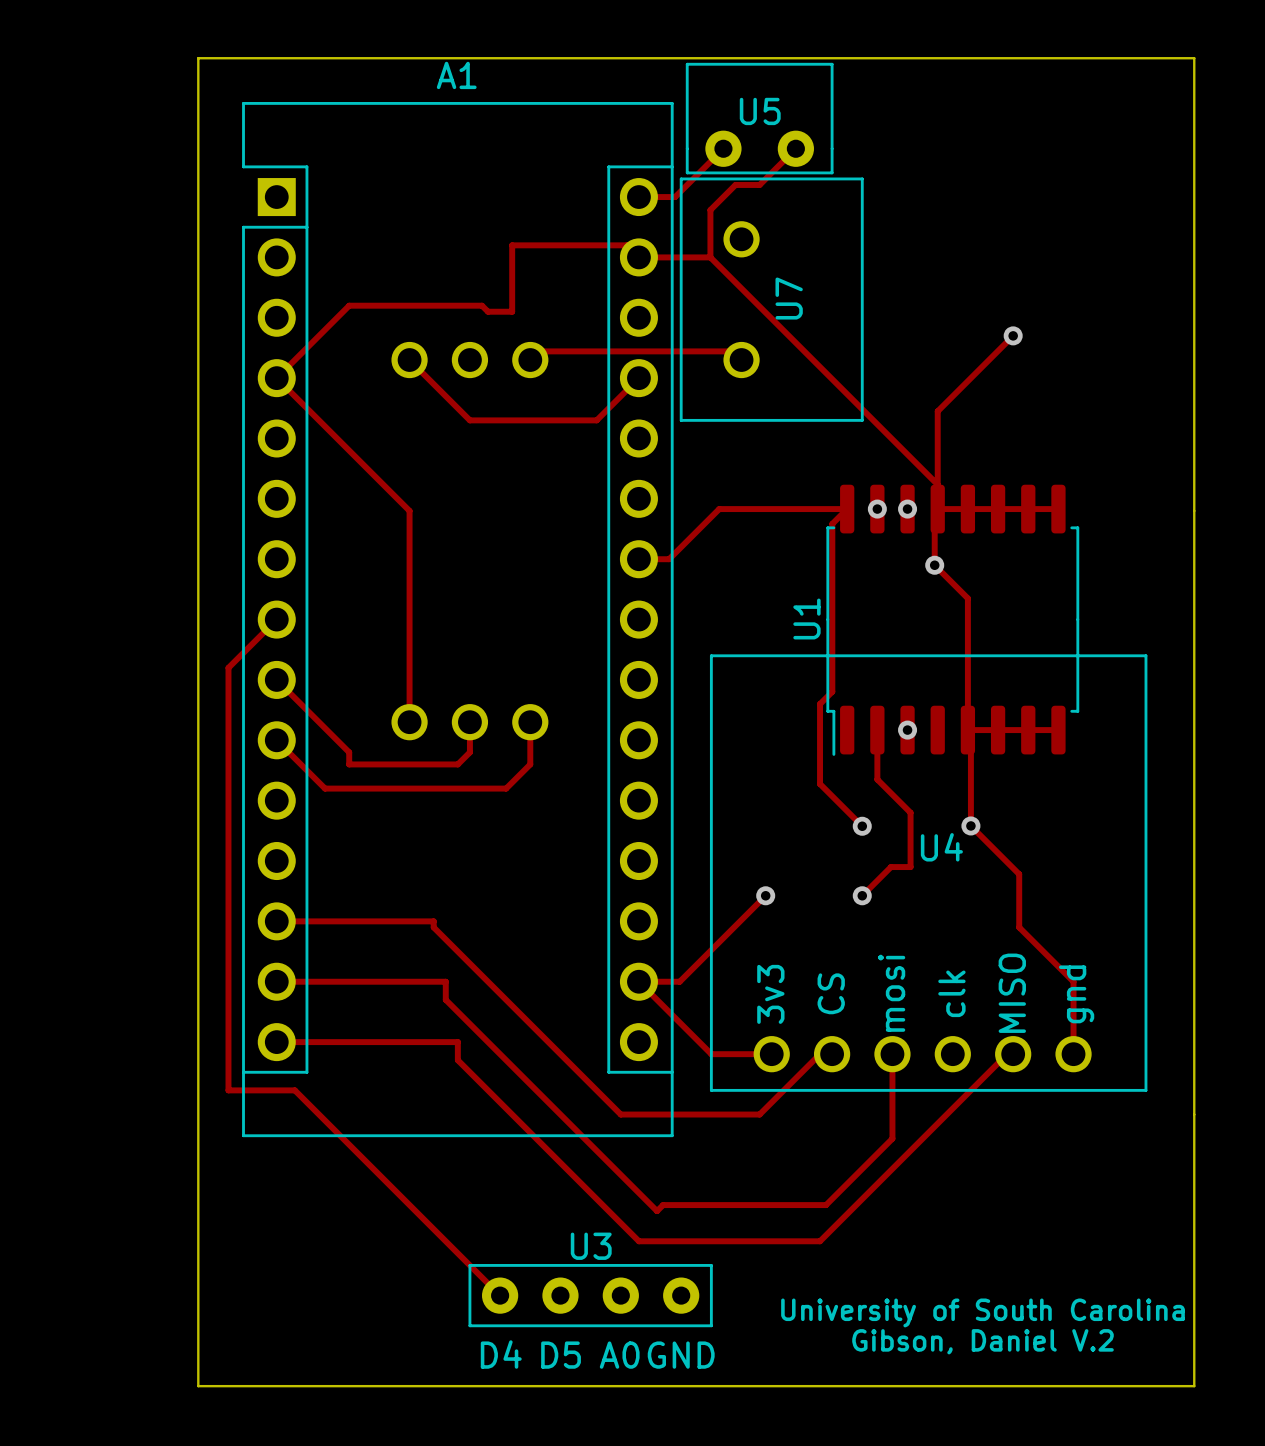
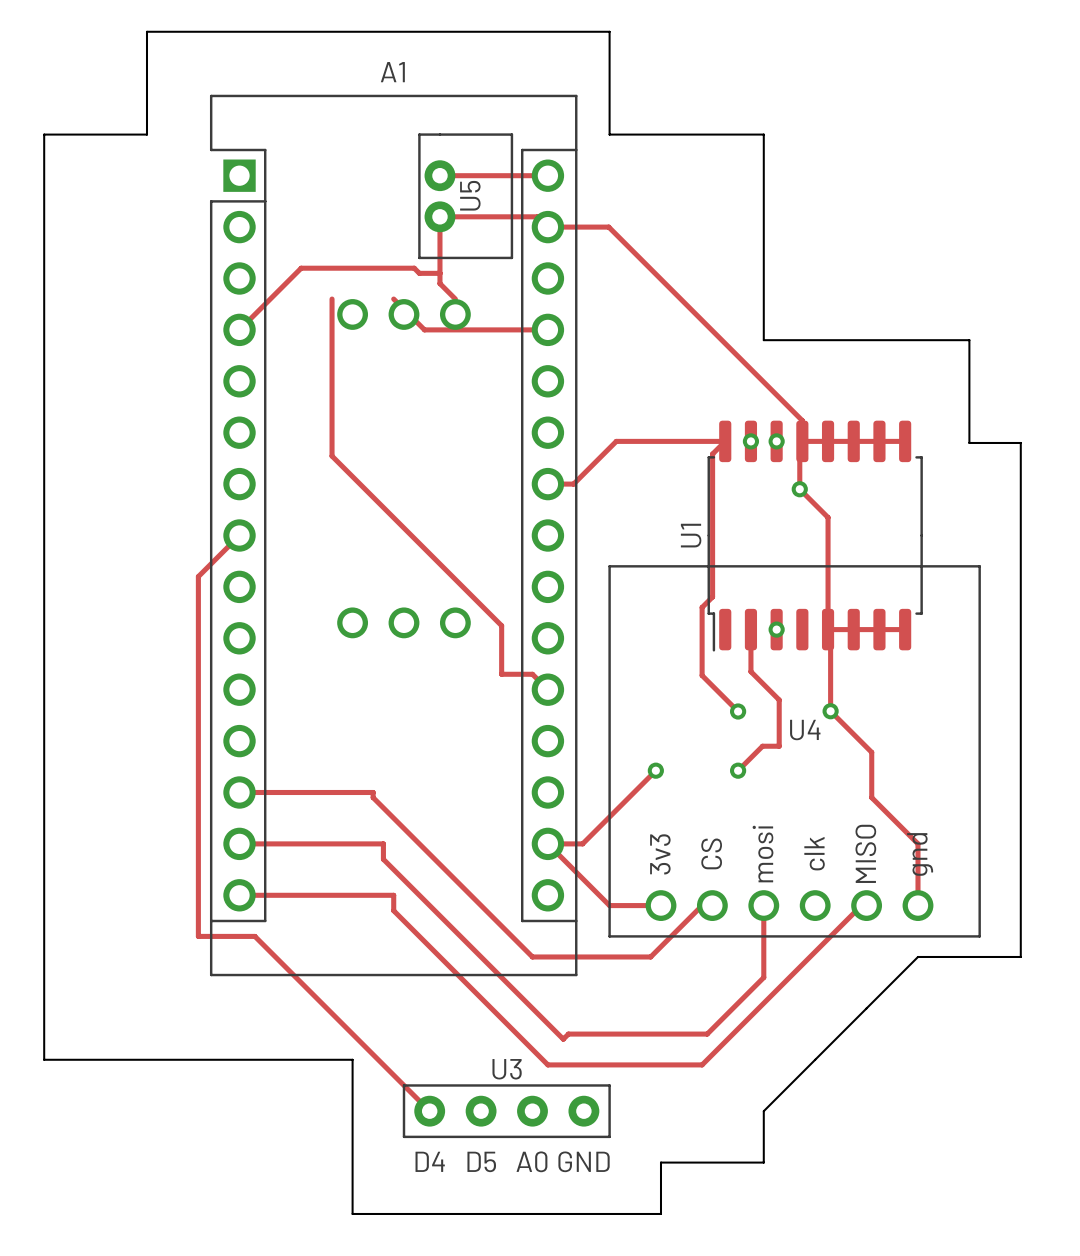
U5 footprint: [685, 62, 834, 175] -> [418, 133, 514, 260]
track: (723, 148) (675, 197) (638, 197) -> (439, 175) (547, 175)
track: (795, 148) (759, 184) (735, 184) (710, 210) (710, 257) -> none
U7: (771, 299) -> none
track: none -> (439, 273) (439, 283) (455, 299)
track: (1013, 335) (937, 411) (937, 484) -> none
via: (1013, 335) -> none
track: none -> (332, 299) (332, 456) (501, 625) (501, 674) (532, 674) (547, 689)
track: (409, 360) (469, 420) (596, 420) (638, 378) -> (393, 299) (424, 329) (547, 329)
track: (530, 360) (538, 351) (732, 351) (741, 360) -> none
track: (276, 378) (409, 510) (409, 722) -> none
board edge: (1194, 510) (1194, 58) (198, 58) (198, 1386) (1194, 1386) (1194, 1114) -> (1020, 442) (969, 442) (969, 340) (763, 340) (763, 134) (609, 134) (609, 31) (146, 31) (146, 134) (44, 134) (44, 1059) (352, 1059) (352, 1213) (660, 1213) (660, 1162) (763, 1162) (763, 1111) (917, 956) (1020, 956)
track: (276, 679) (349, 752) (349, 764) (457, 764) (469, 752) (469, 722) -> none
track: (530, 722) (530, 764) (506, 788) (325, 788) (276, 740) -> none
text: University of South Carolina (983, 1312) -> none
text: Gibson, Daniel V.2 (983, 1341) -> none

